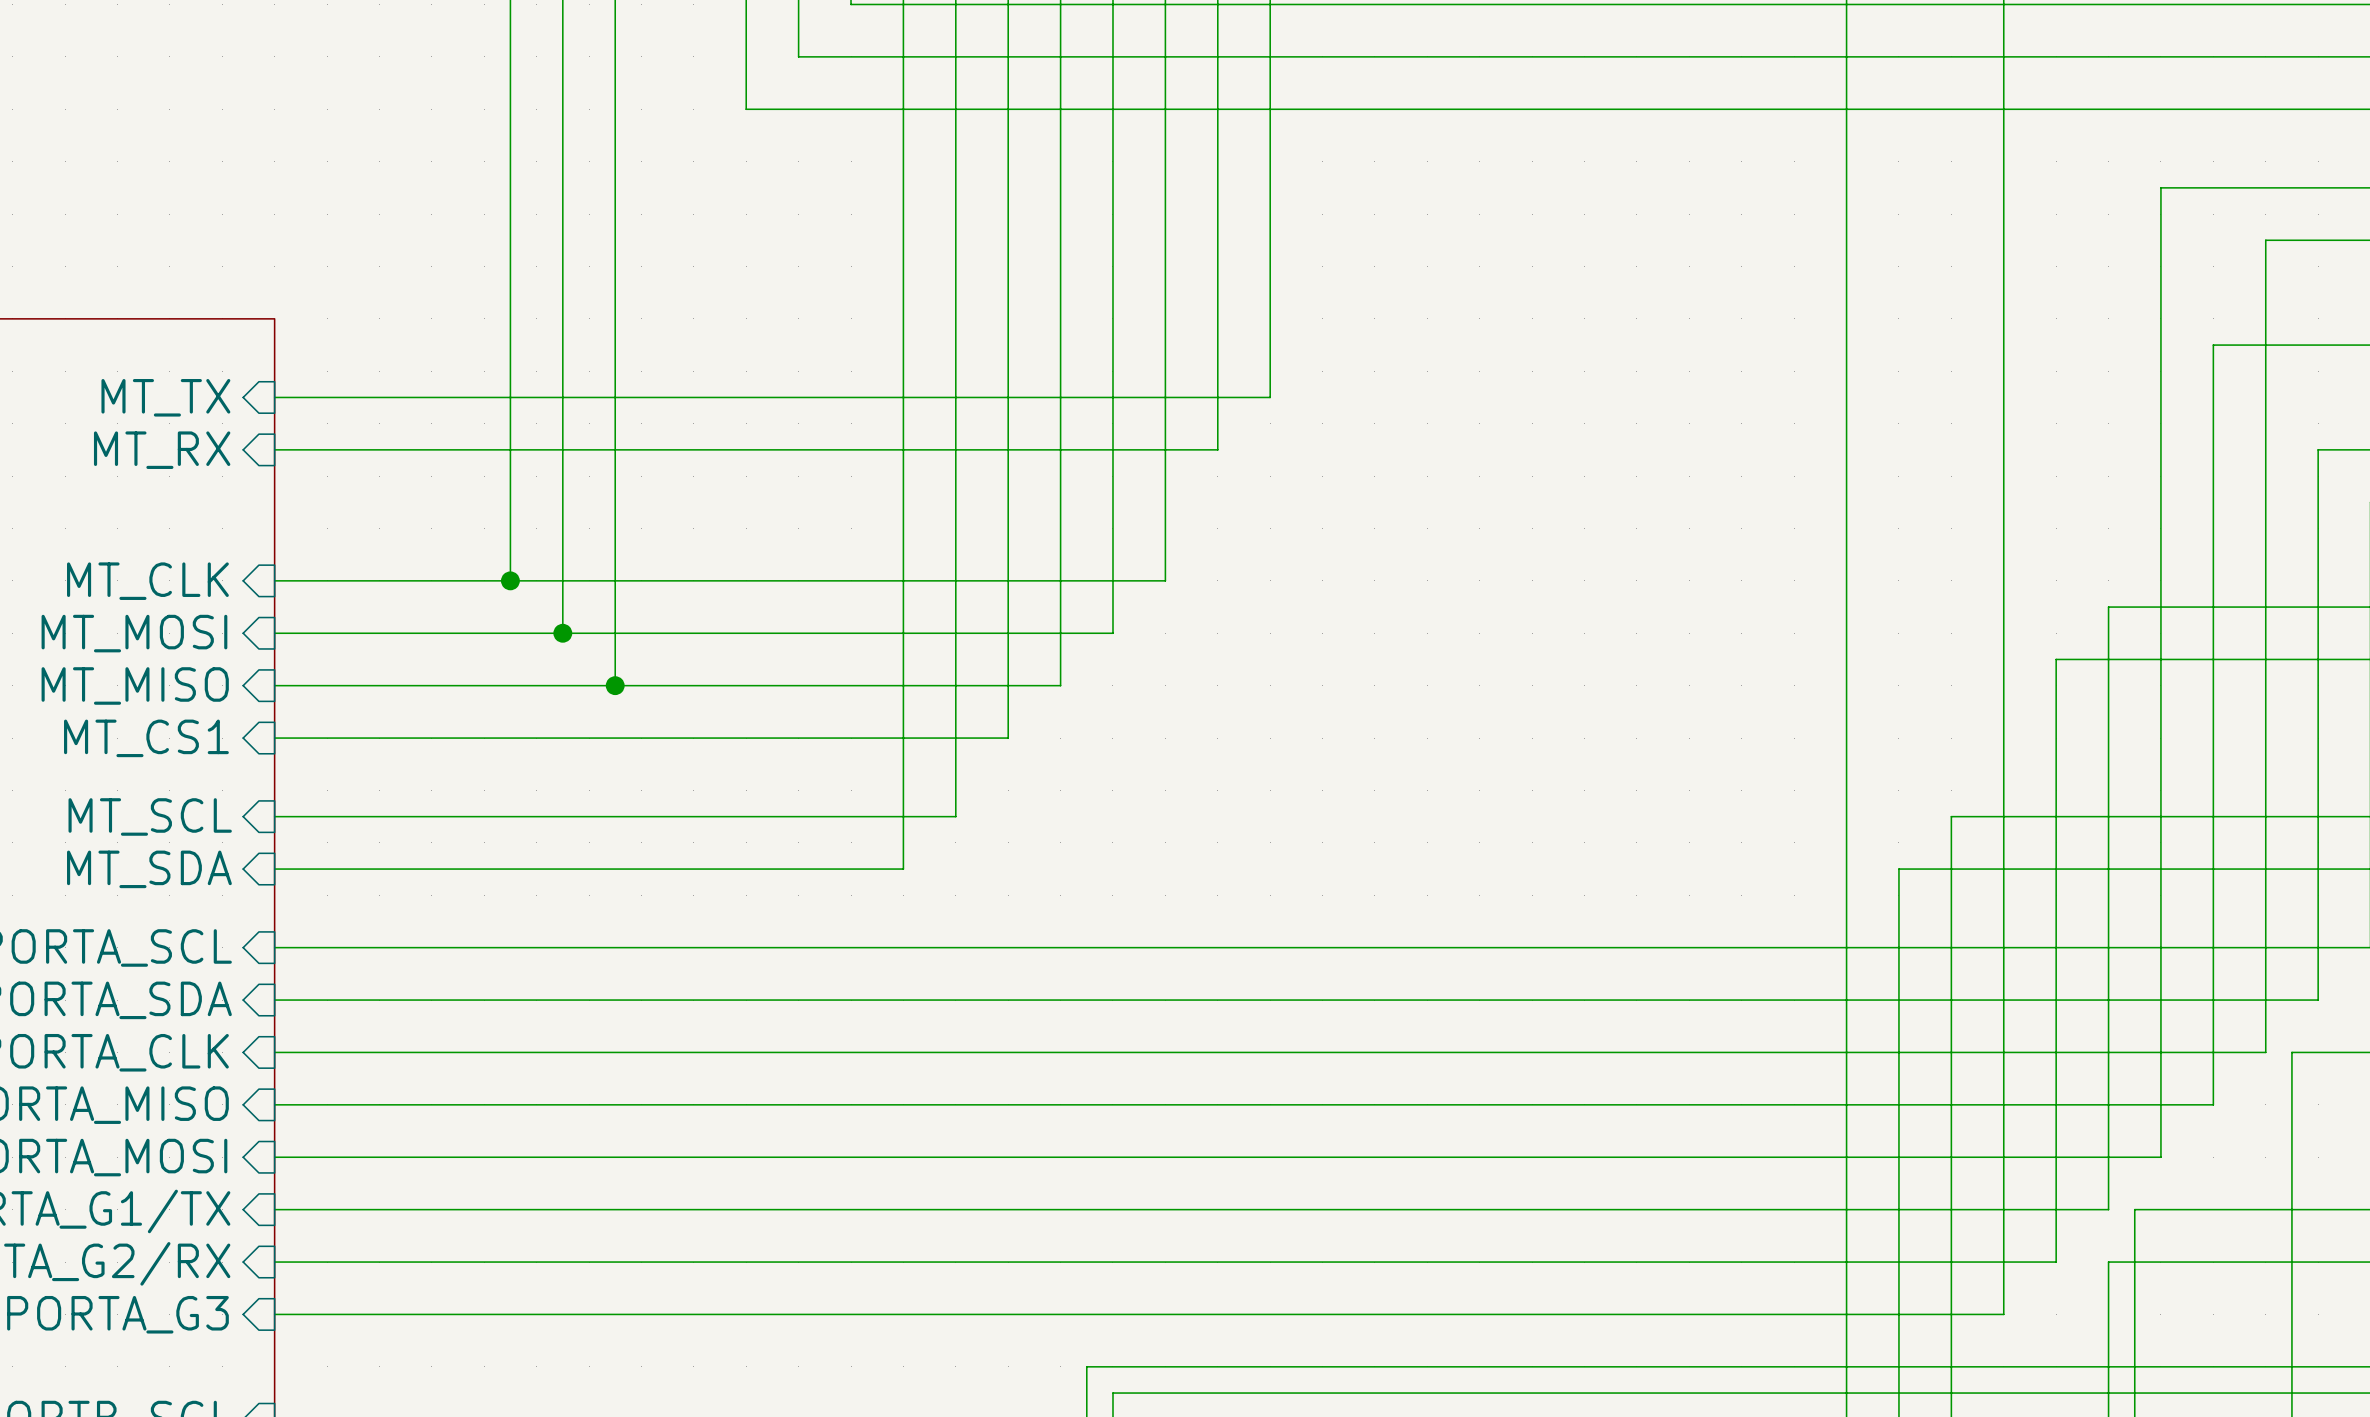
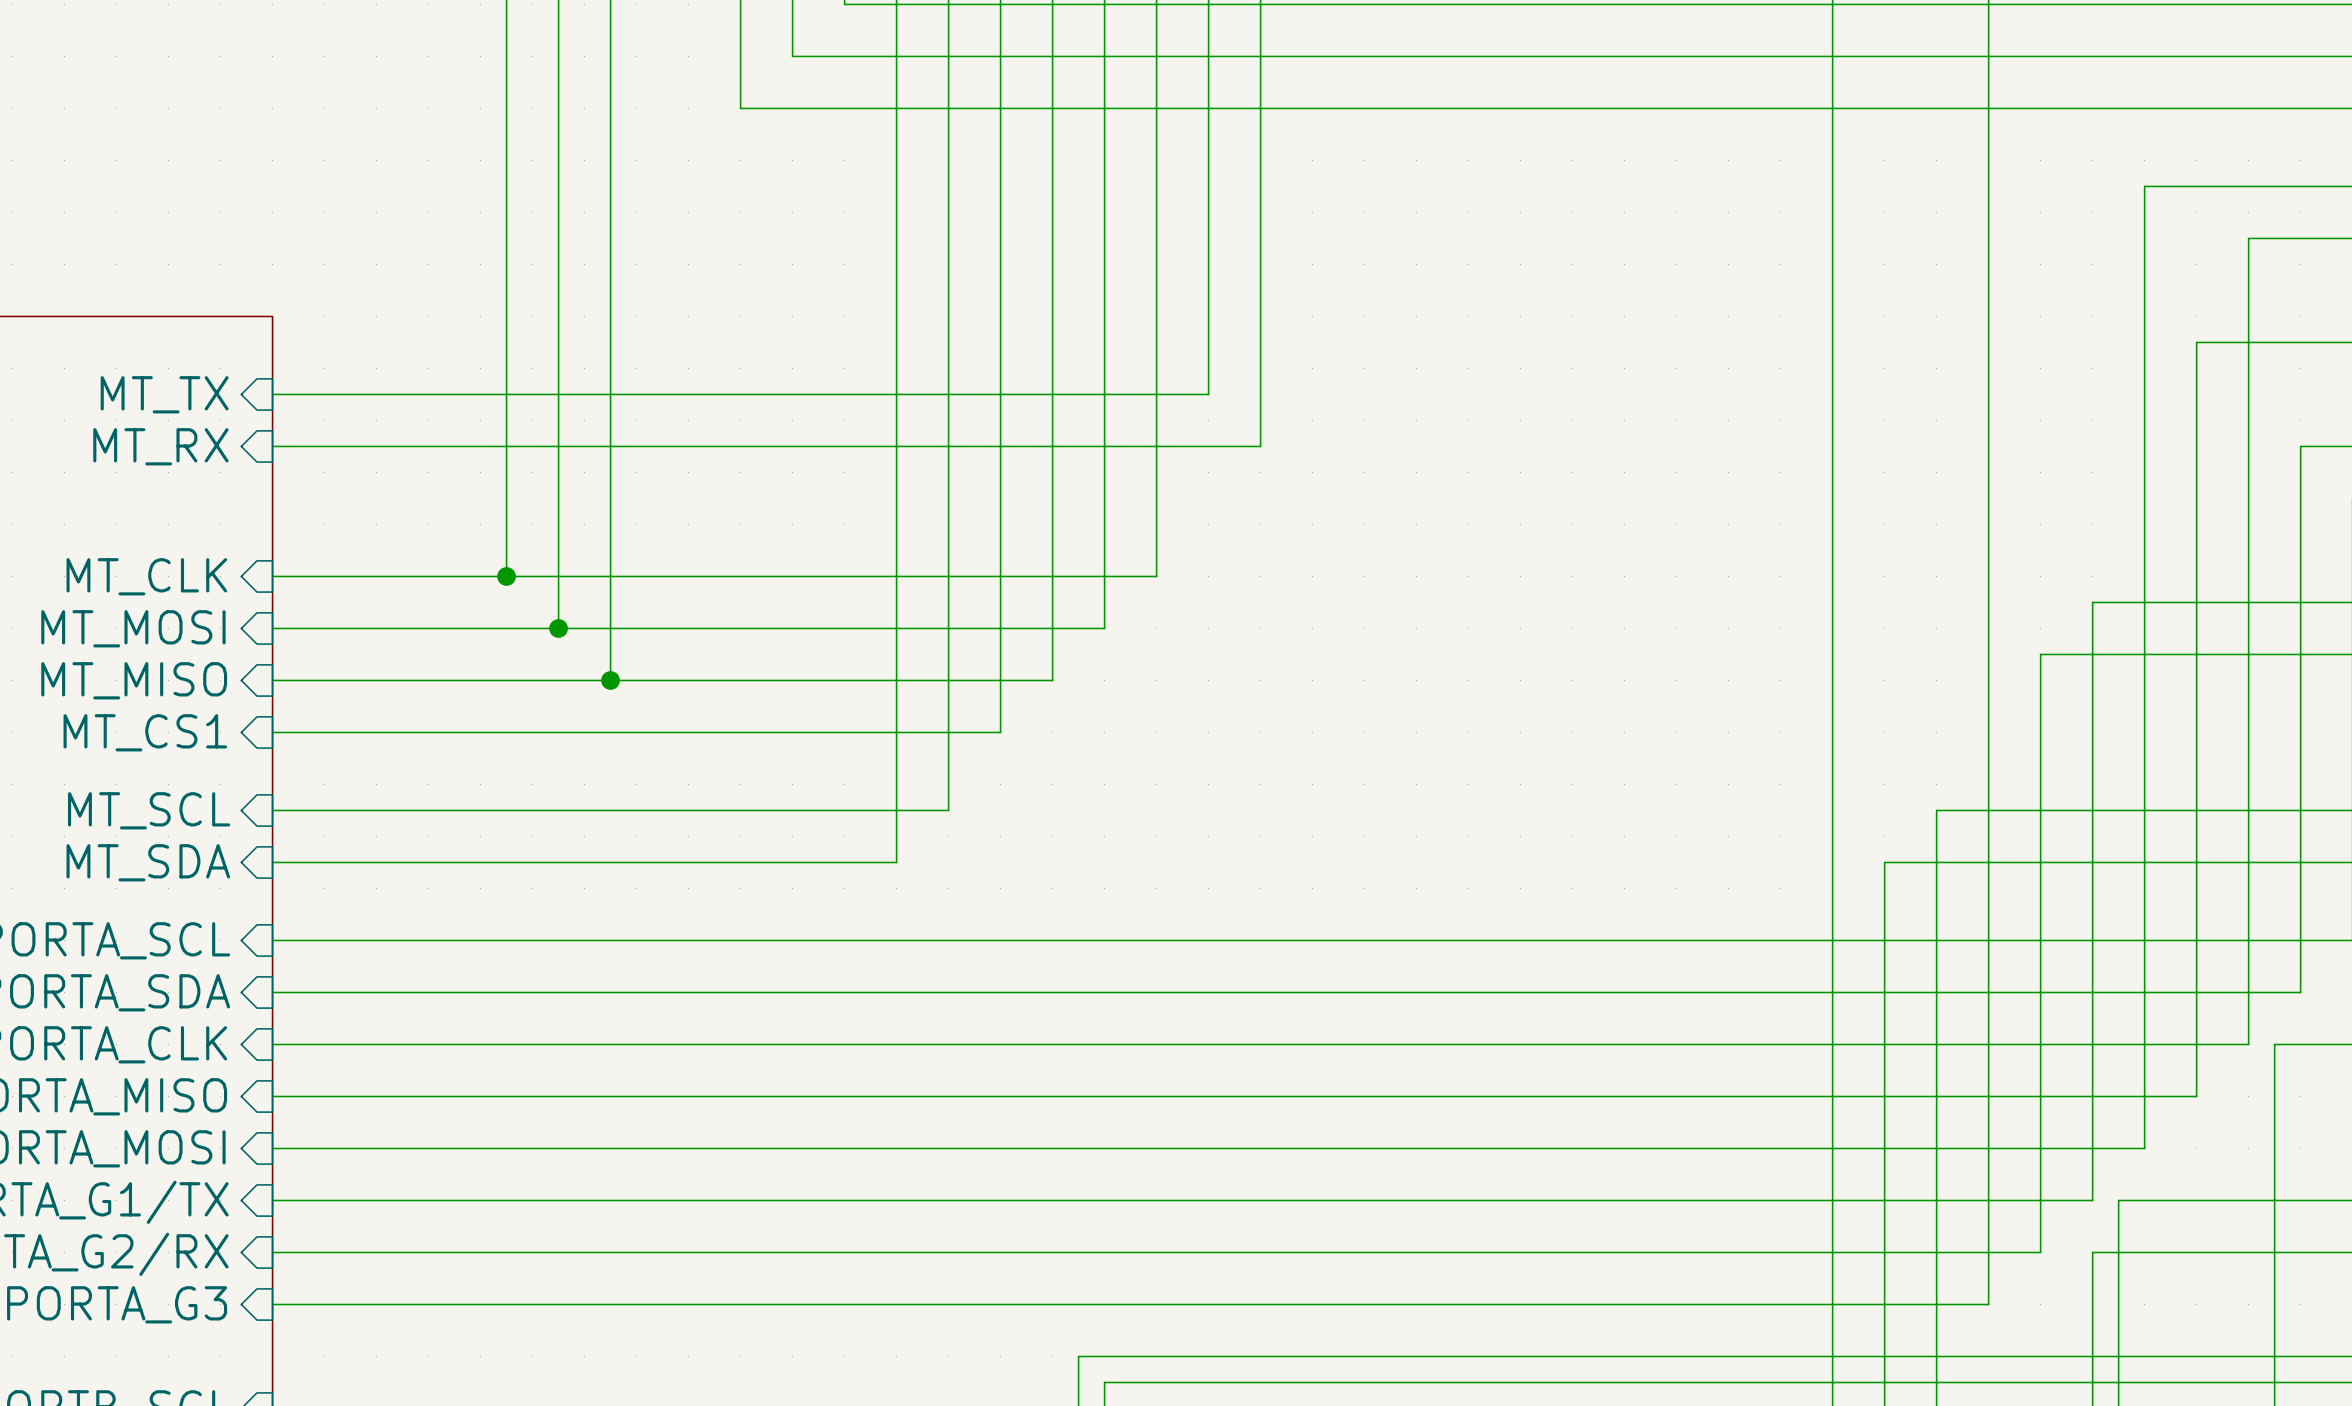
wire: (1270, 397) (1217, 397) (1217, 449) -> (1260, 394) (1260, 446) (1208, 446)

